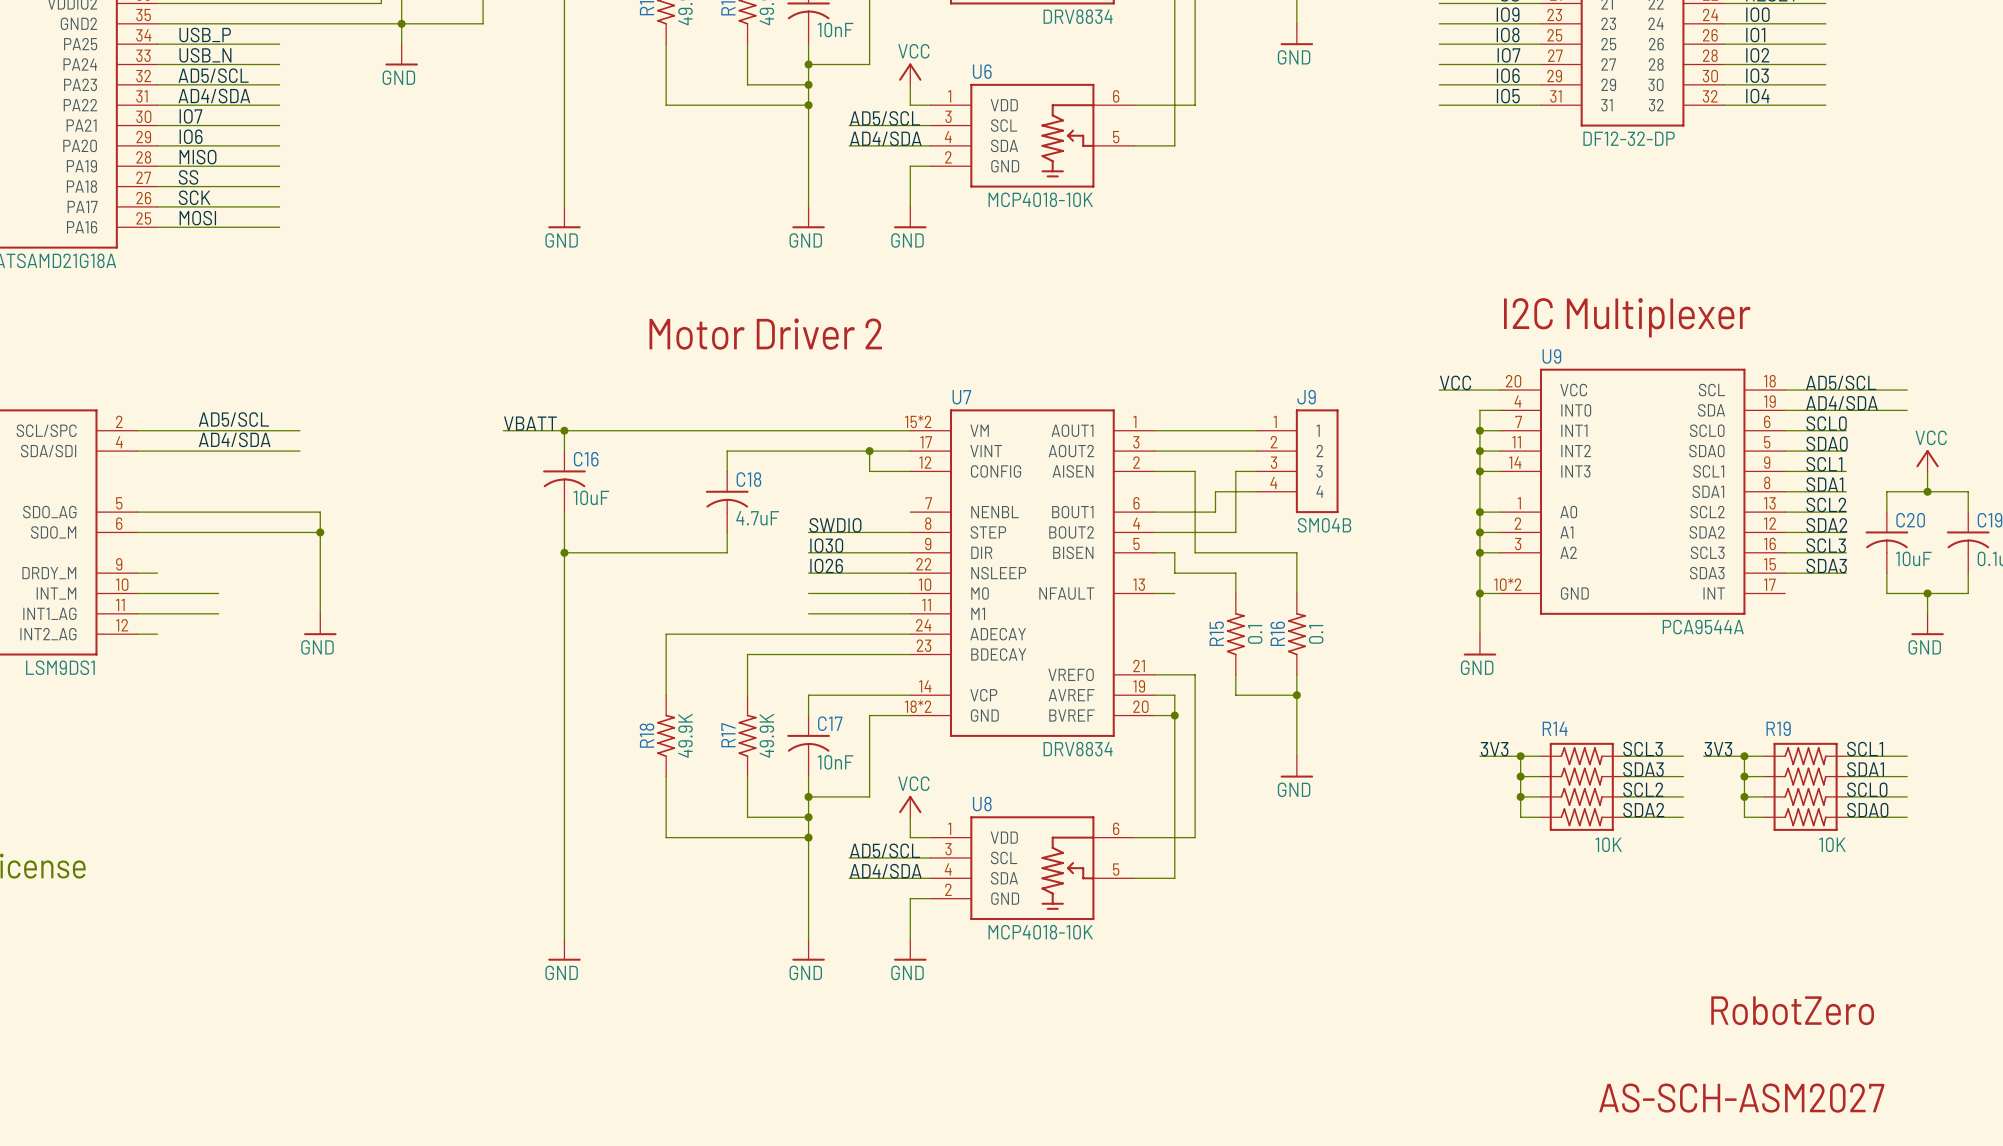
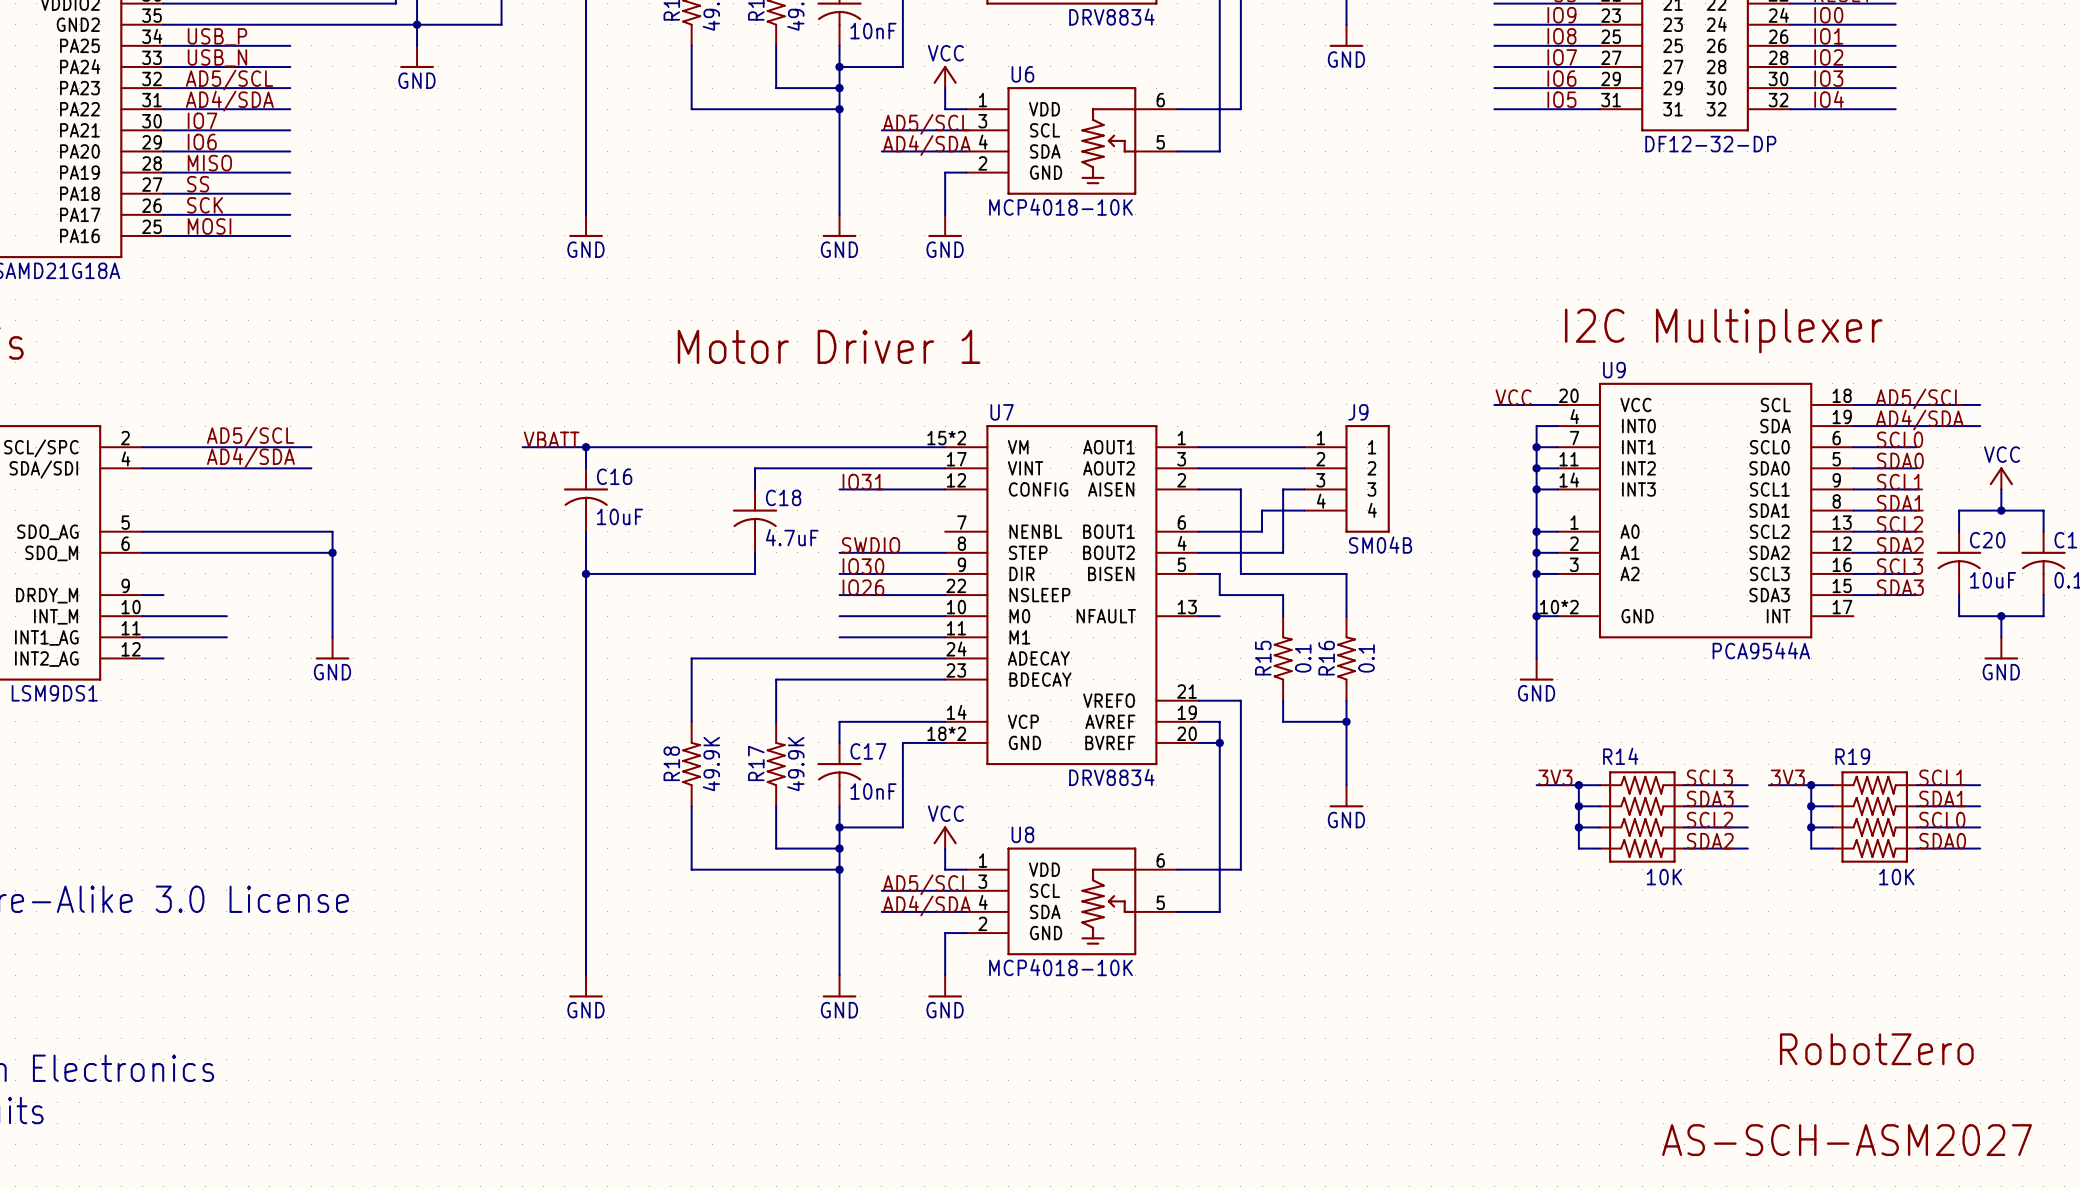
text: Motor Driver 2 (765, 334) -> Motor Driver 1 (829, 346)
wire: (869, 451) (869, 471) -> (839, 489) (902, 489)
junction: (869, 451) -> none
label: none -> IO31 (863, 482)

